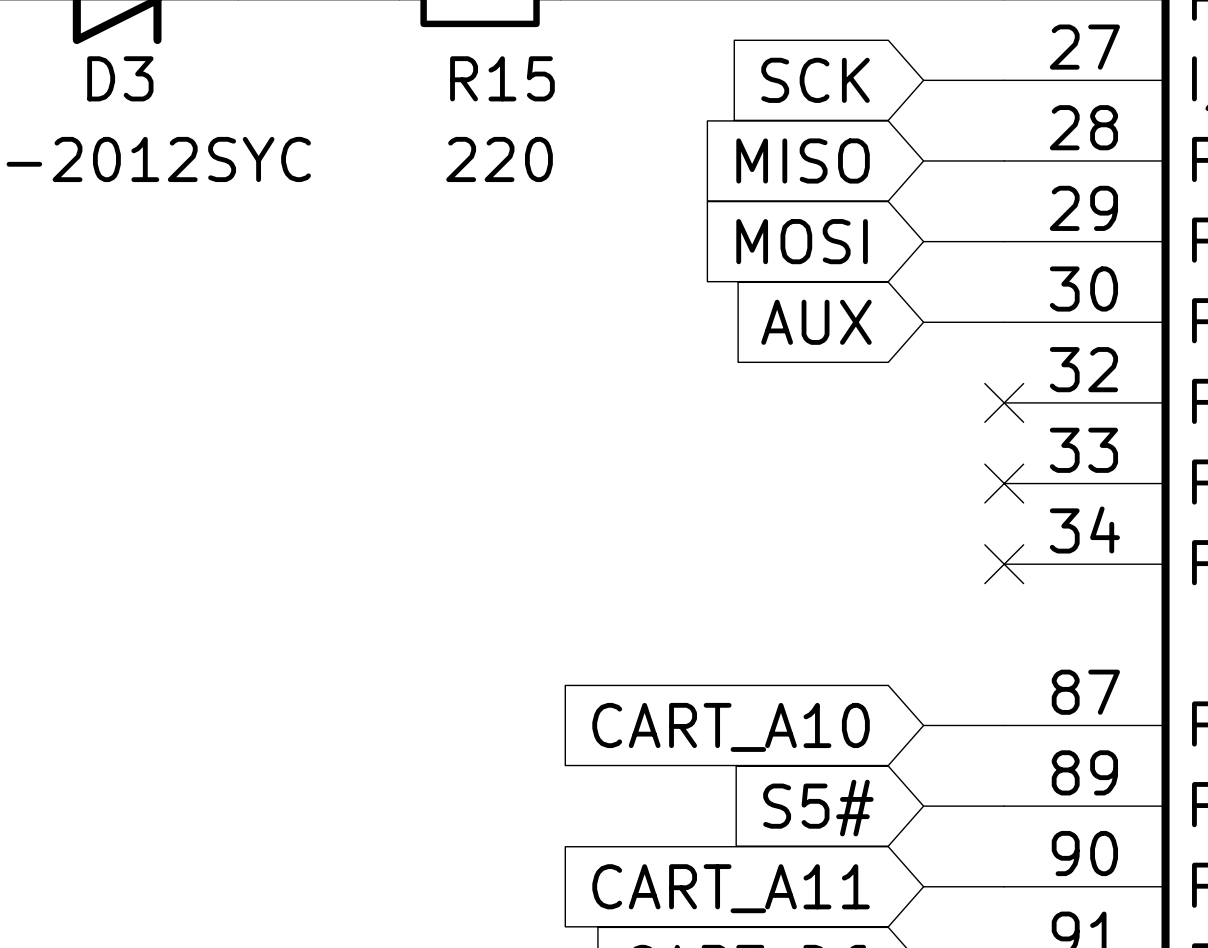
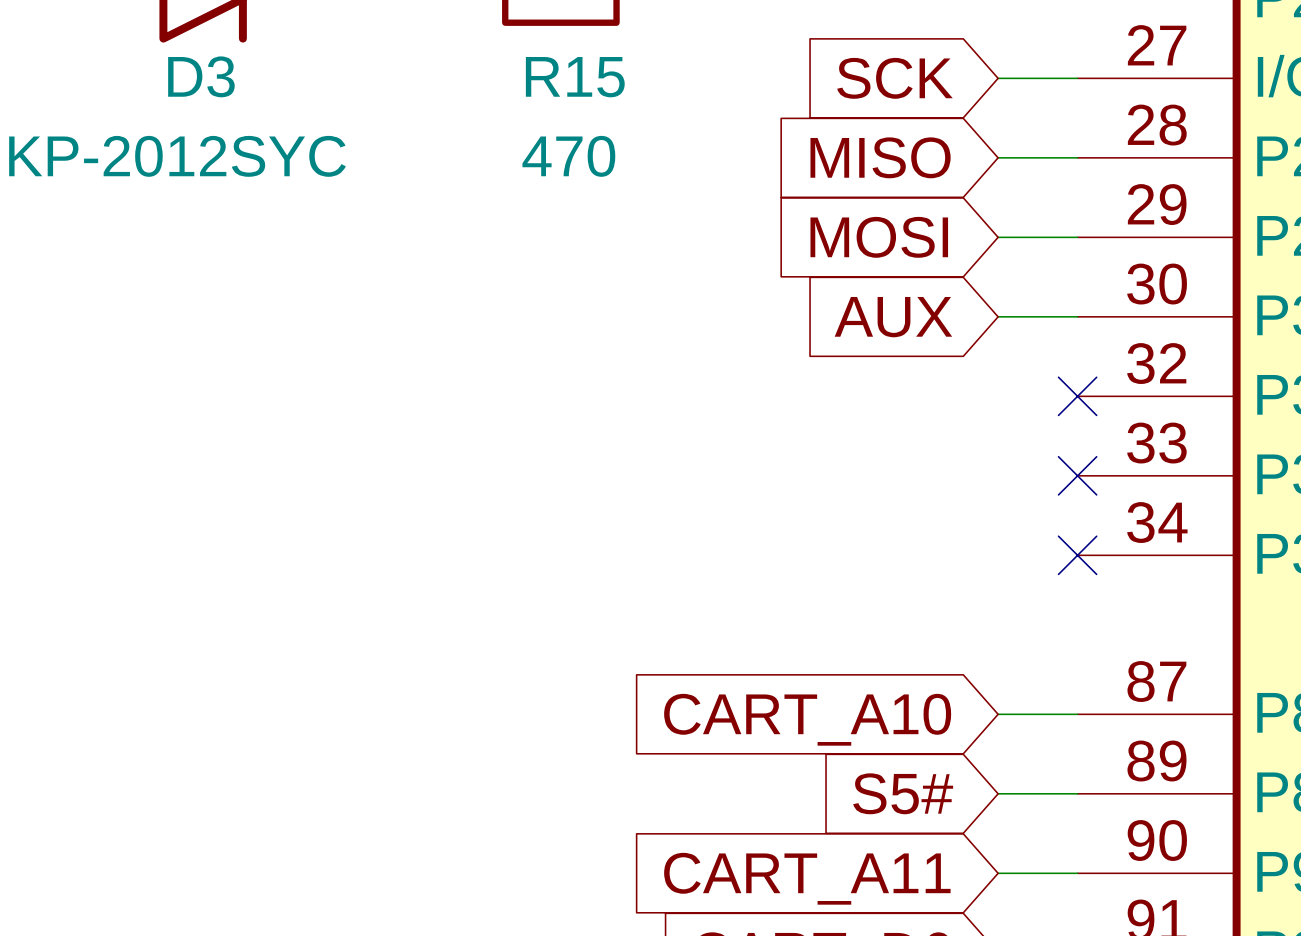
R15 value: 220 (499, 159) -> 470 (568, 156)

